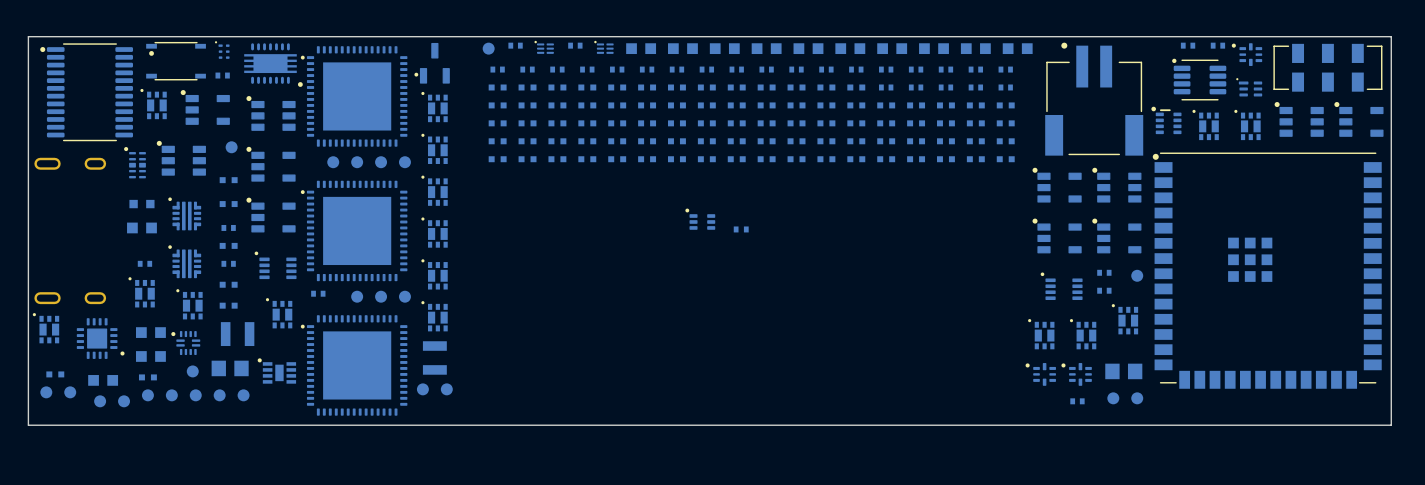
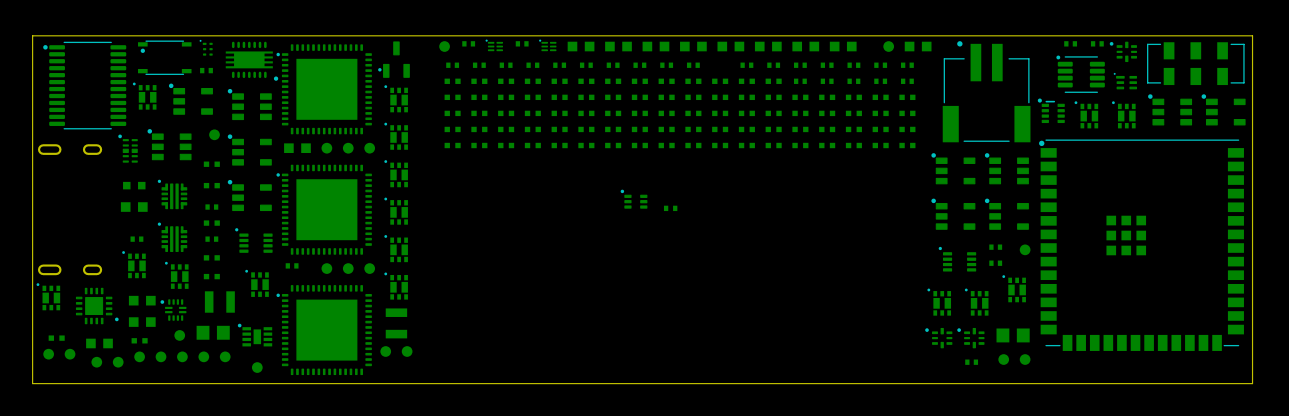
part footprint: [960, 43, 991, 55] -> [883, 41, 895, 52]
part: (796, 69) -> none
part footprint: [327, 156, 340, 169] -> [284, 143, 311, 153]
part: none -> (257, 367)

